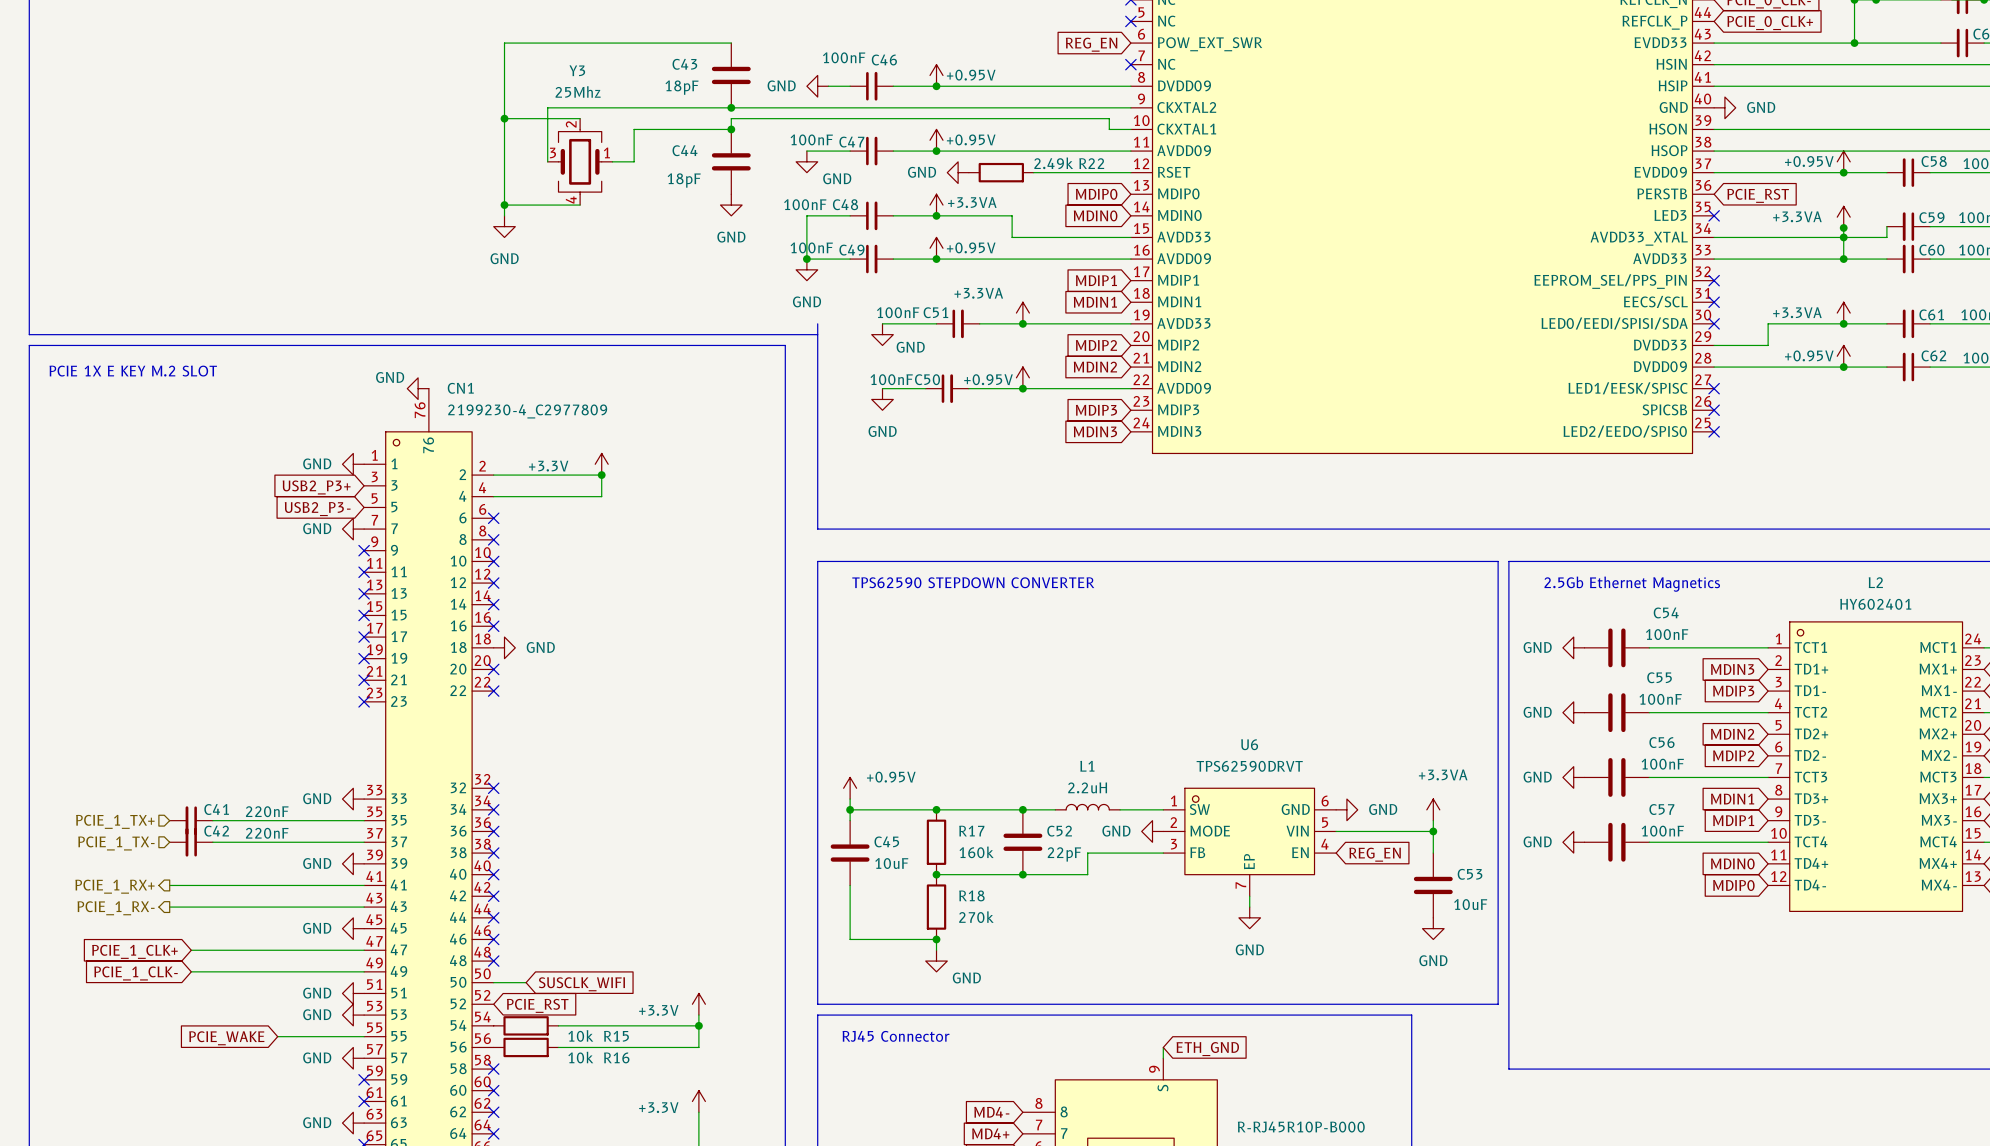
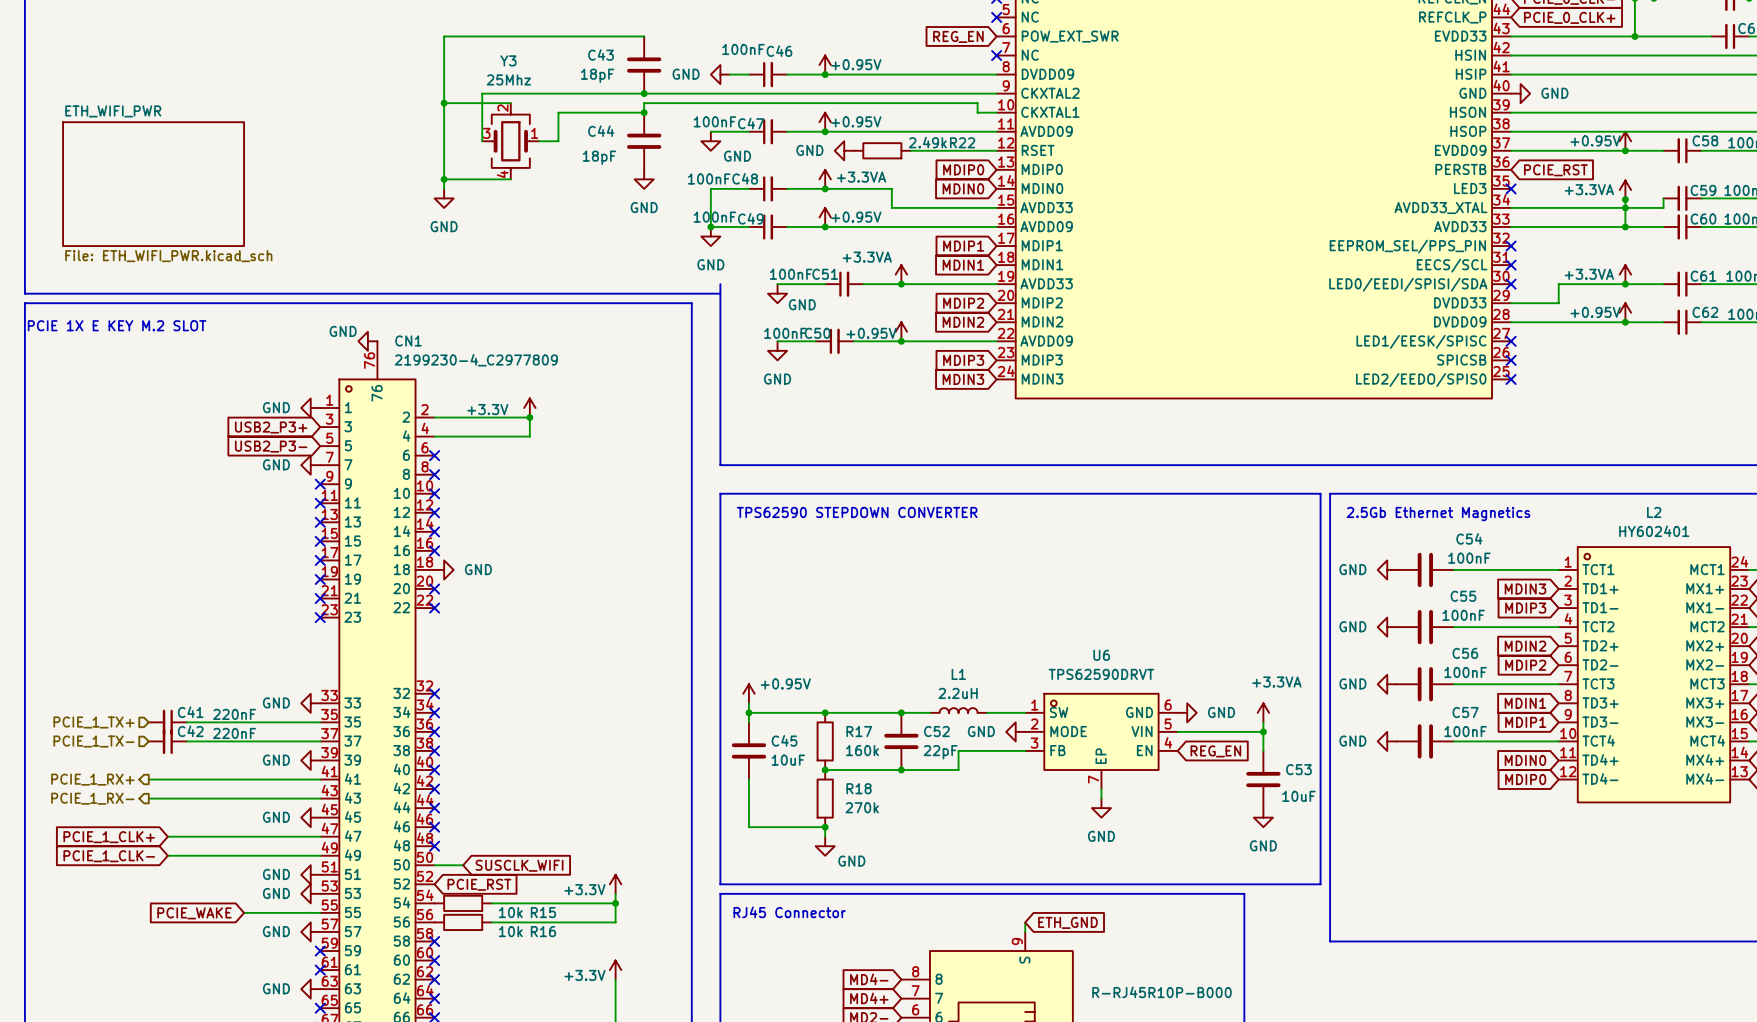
sheet ETH_WIFI_PWR: none -> File: ETH_WIFI_PWR.kicad_sch (153, 184)

